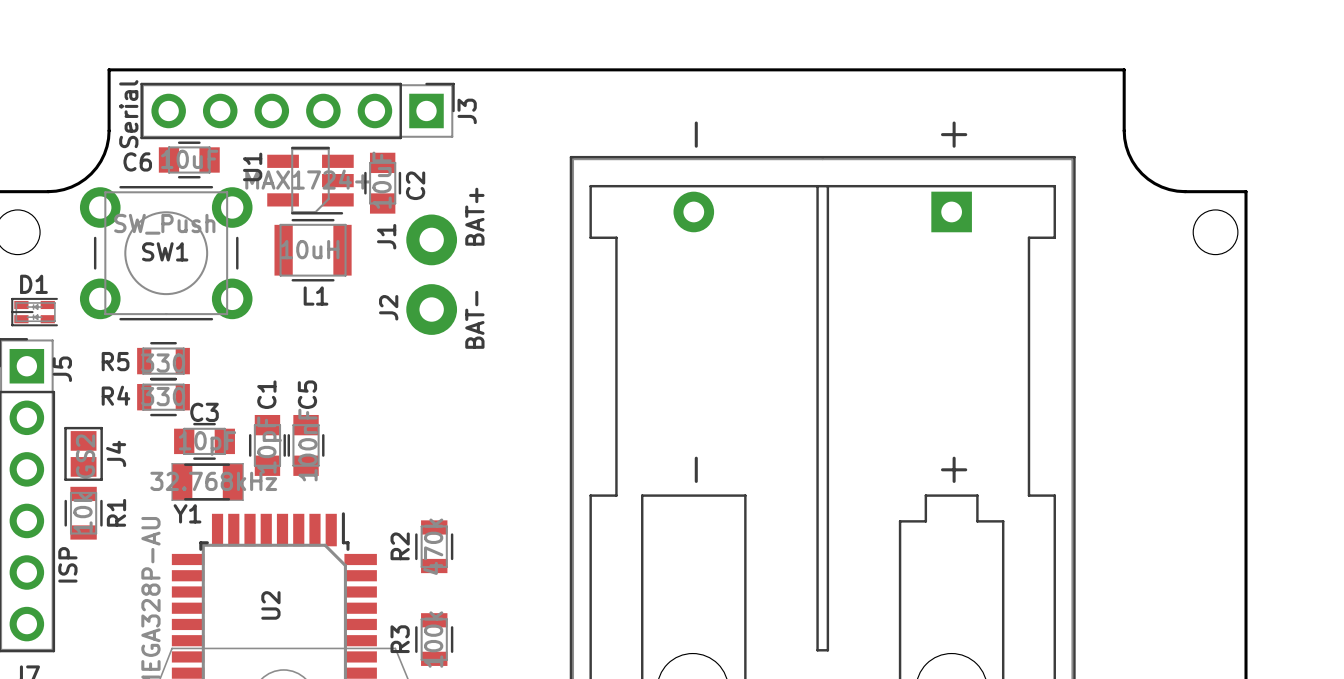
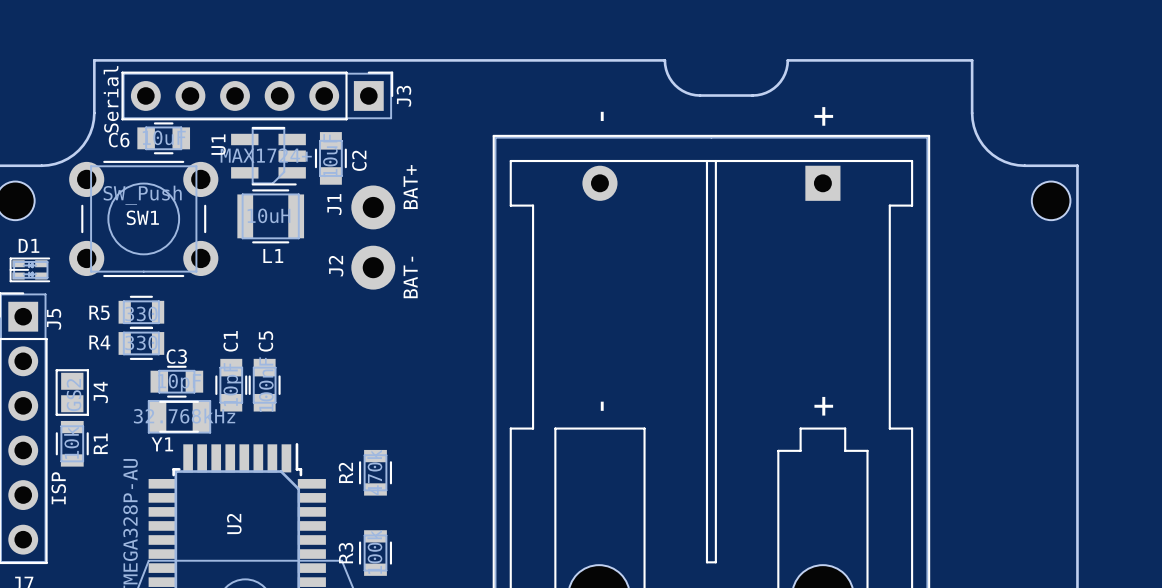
board edge: (768, 69) (911, 69) -> (664, 60) (667, 73) (675, 85) (686, 92) (700, 95) (752, 95) (766, 92) (780, 81) (785, 73) (787, 60)

